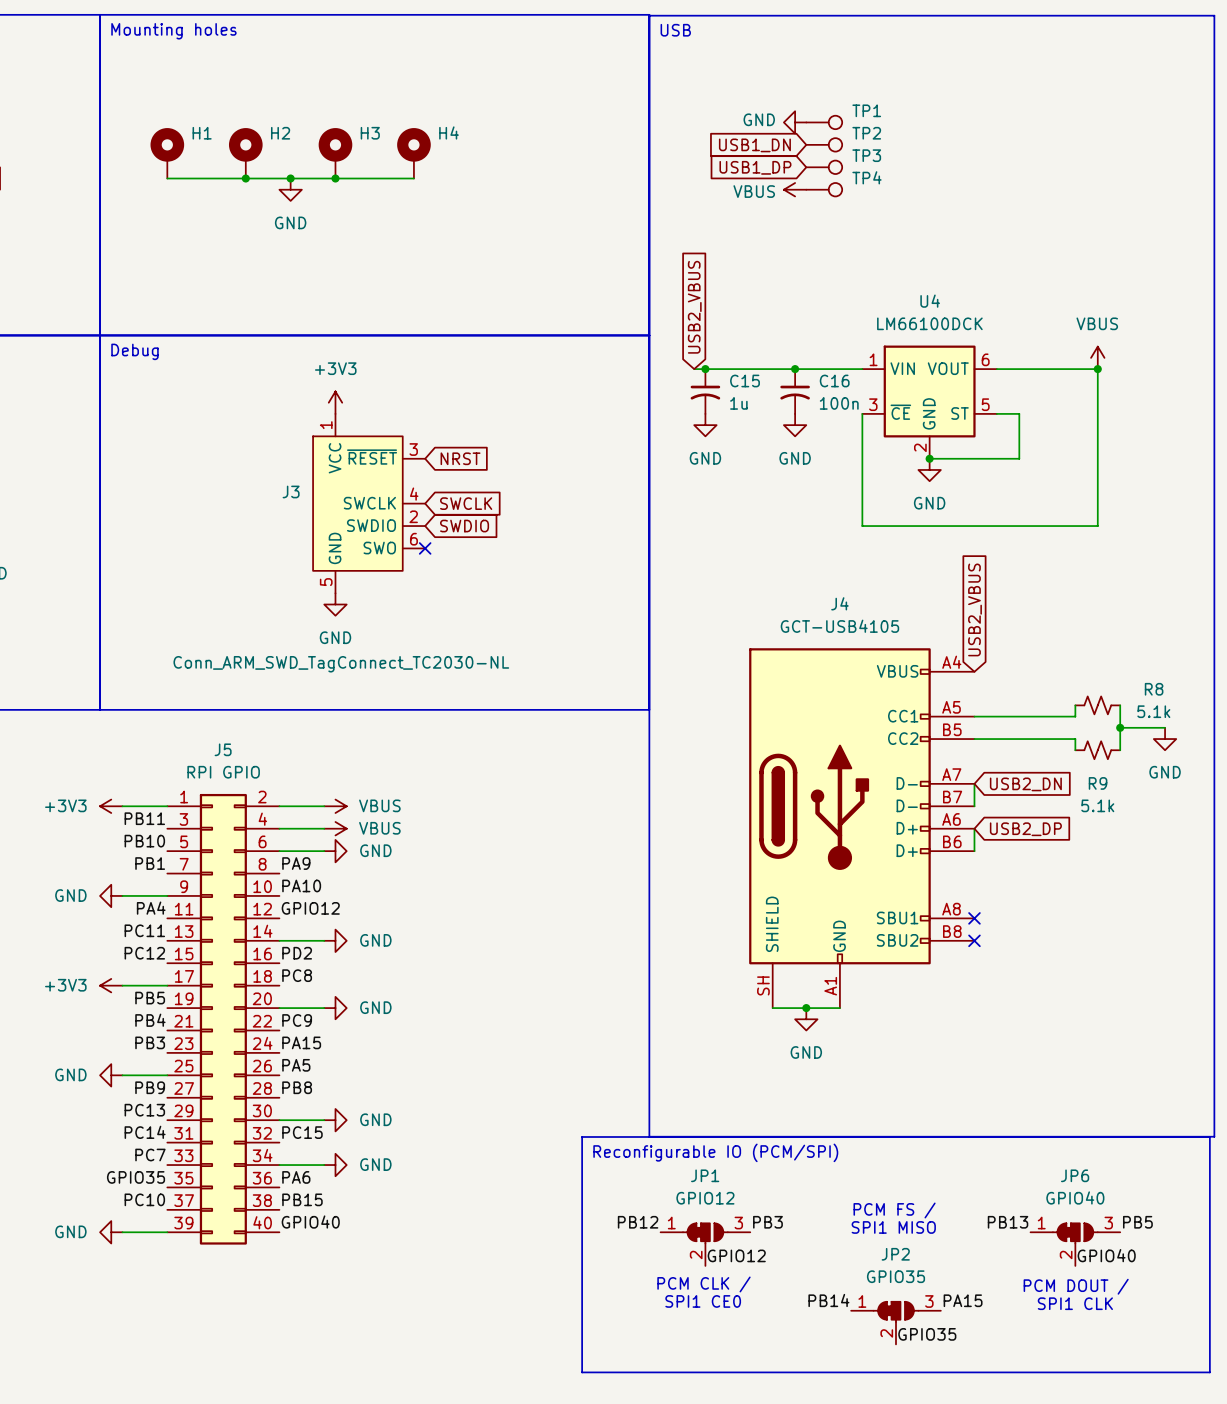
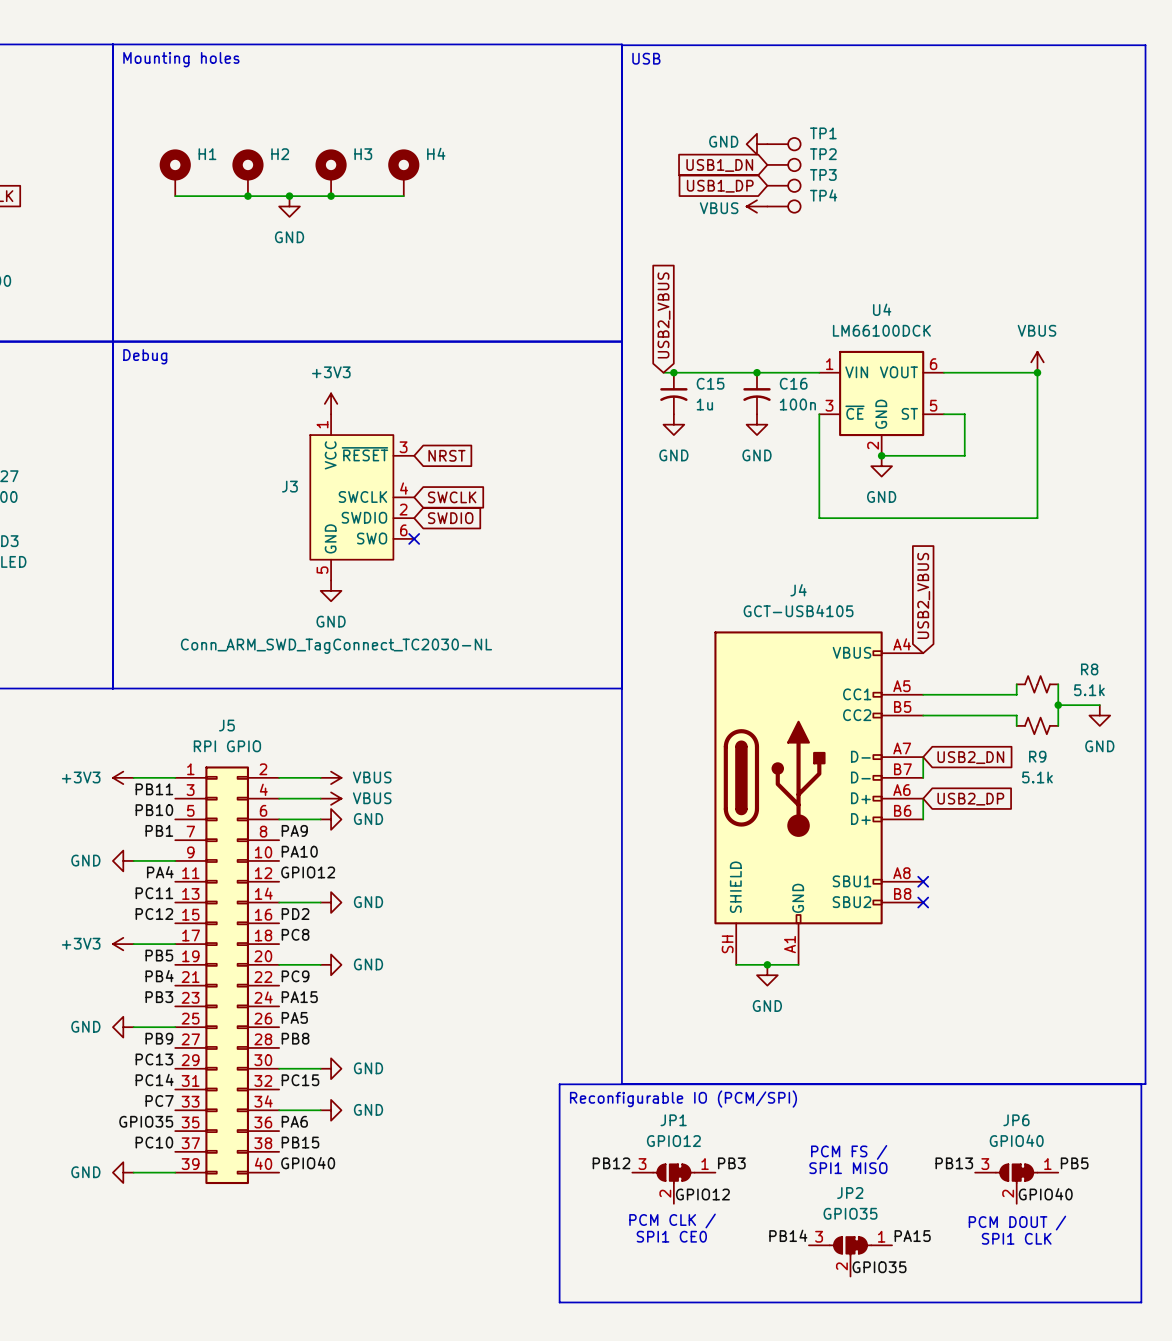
JP1 flip: as is (705, 1233) -> left-right (673, 1173)
JP6 flip: as is (1075, 1233) -> left-right (1016, 1173)
JP2 flip: as is (896, 1311) -> left-right (850, 1246)

